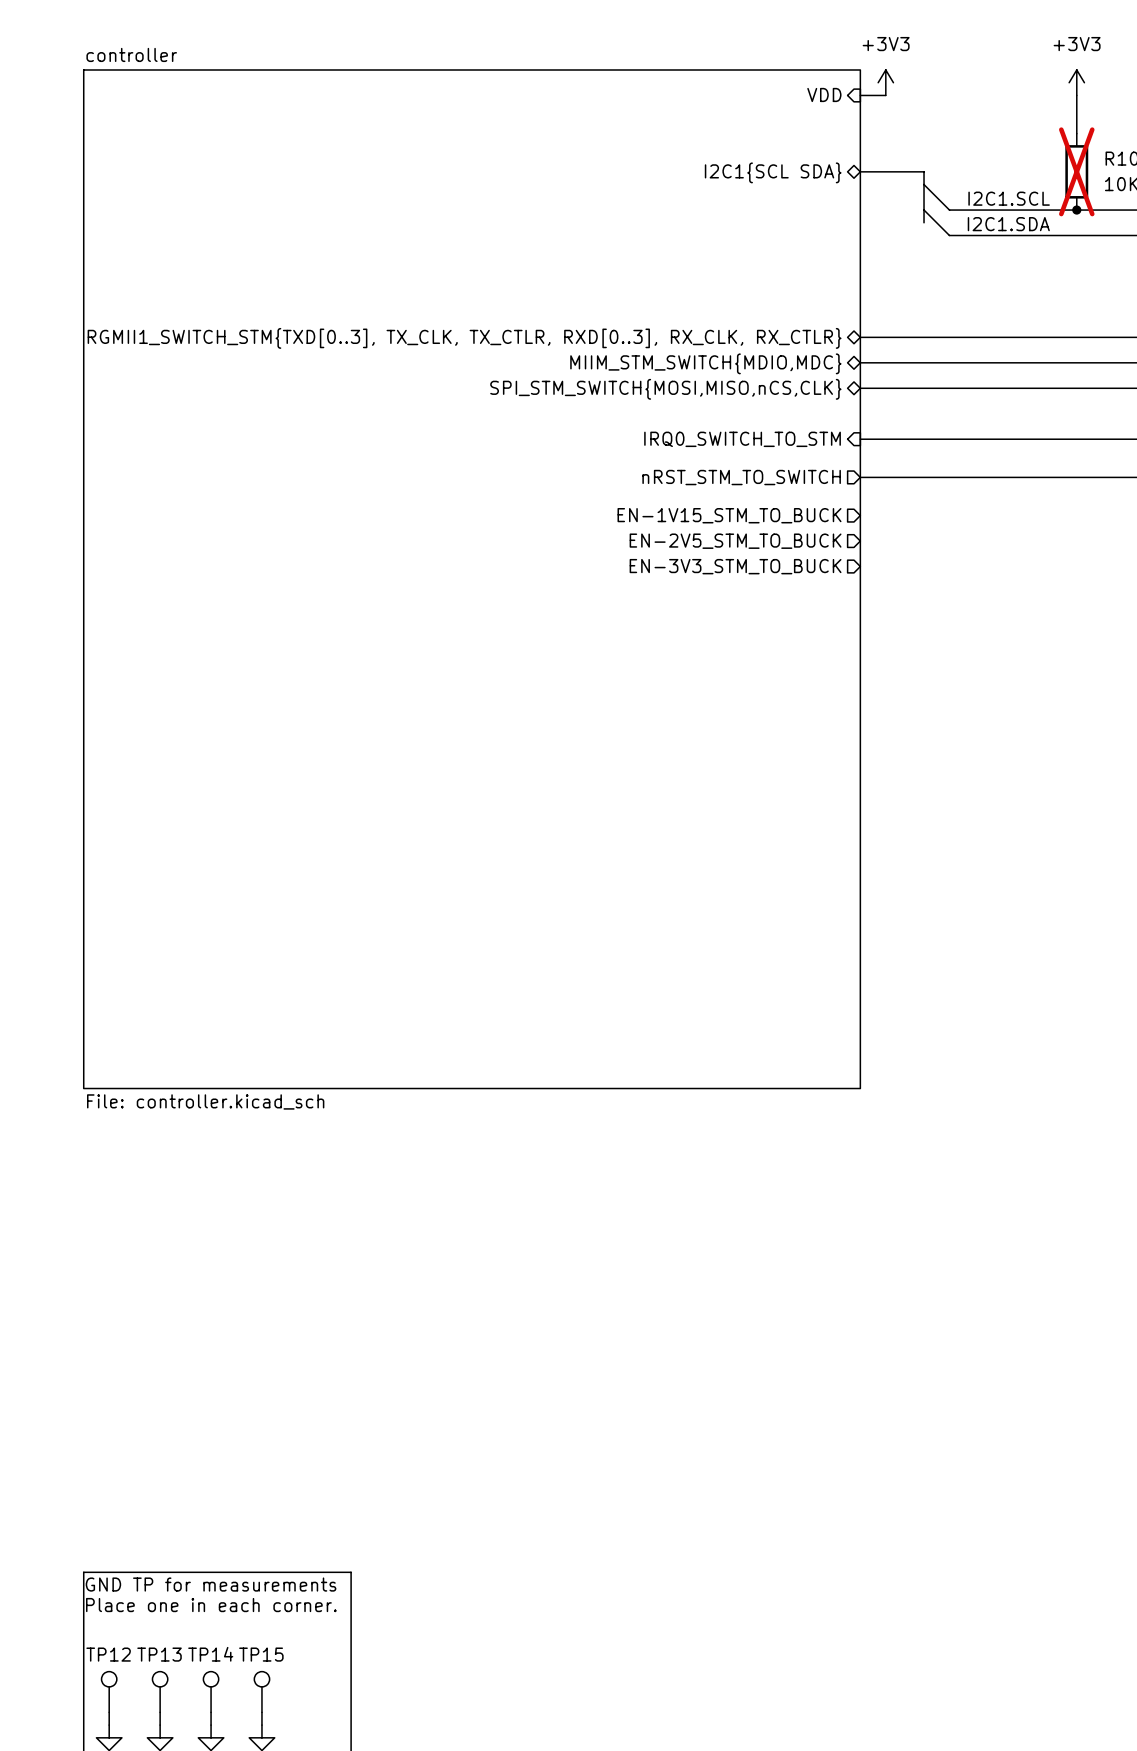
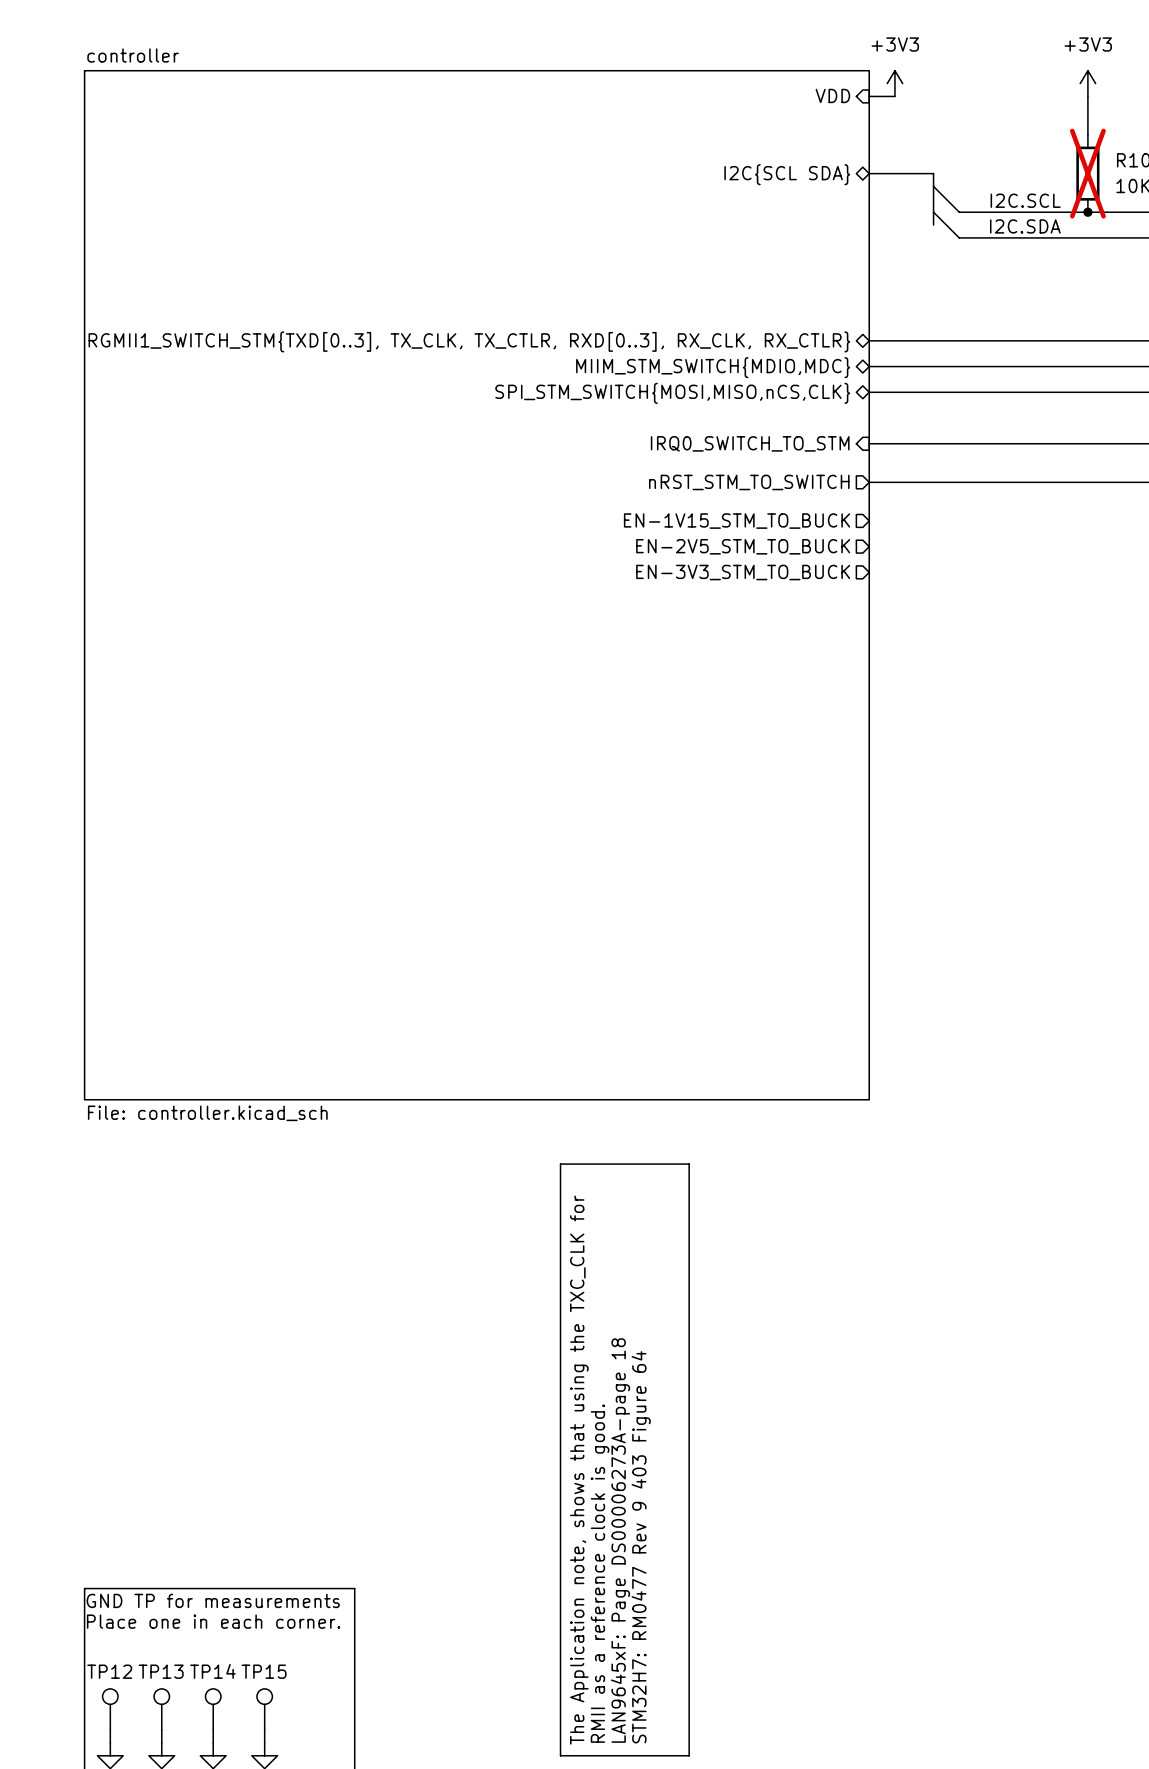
sheet pin: I2C1{SCL SDA} (773, 172) -> I2C{SCL SDA} (787, 174)
label: I2C1.SCL (1009, 198) -> I2C.SCL (1025, 200)
label: I2C1.SDA (1008, 224) -> I2C.SDA (1025, 226)
line: none -> (560, 1164) (689, 1164) (689, 1755) (560, 1755) (560, 1164)
text: none -> The Application note, shows that using the TXC_CLK for (579, 1470)
text: none -> LAN9645xF: Page DS00006273A-page 18 (620, 1540)
text: none -> STM32H7: RM0477 Rev 9 403 Figure 64 (641, 1547)
text: none -> RMII as a reference clock is good. (600, 1573)

